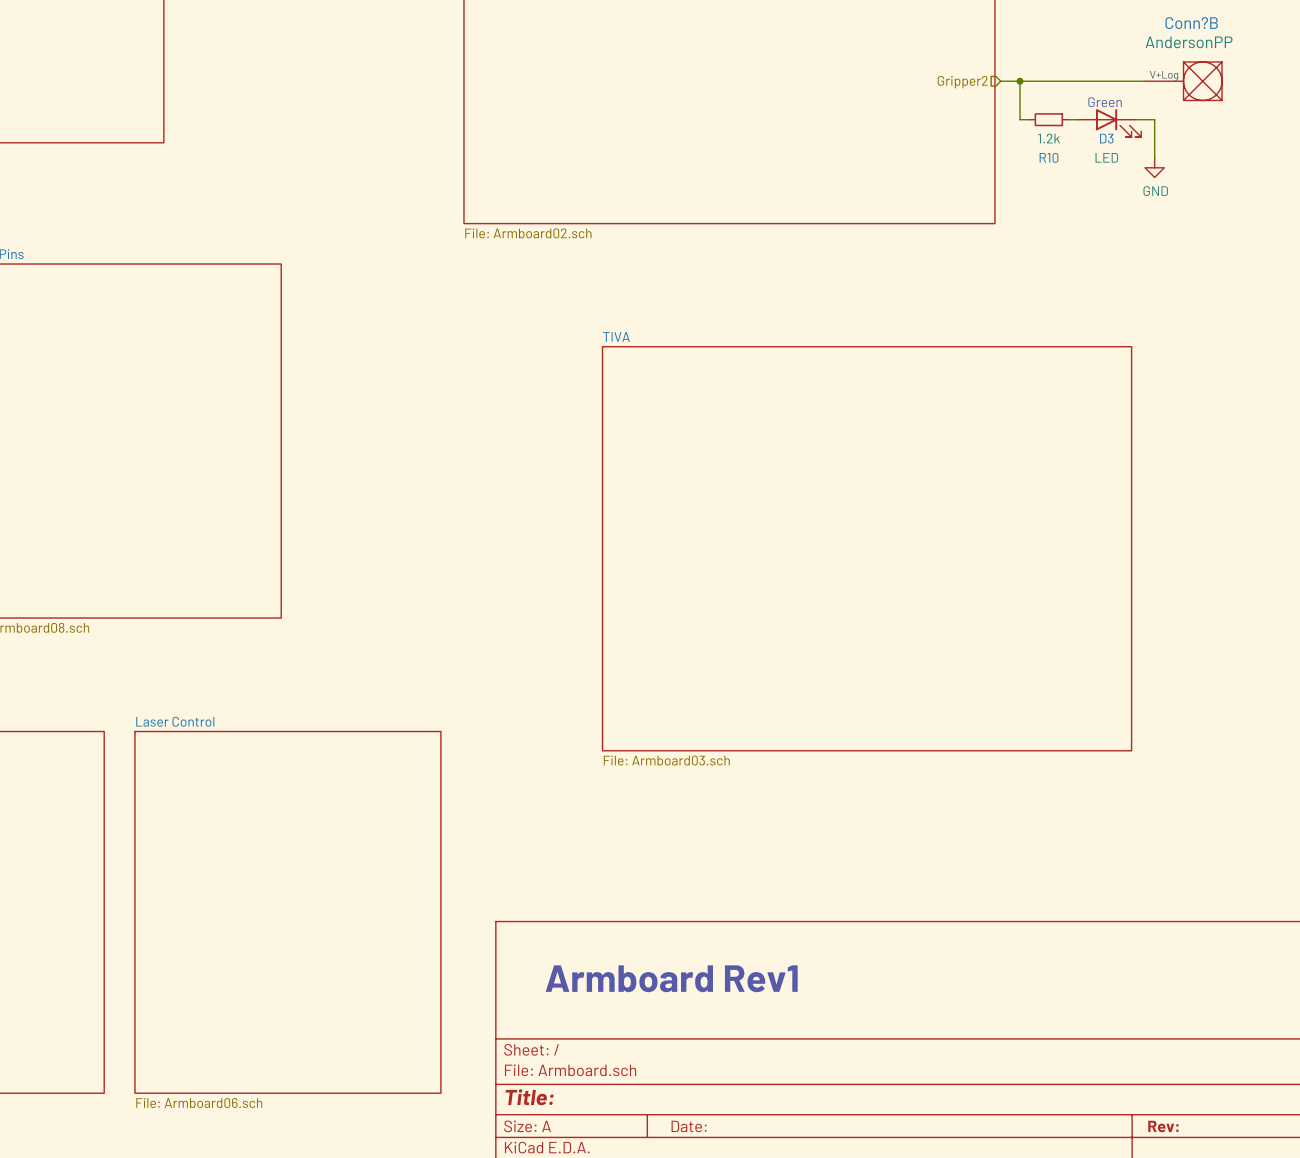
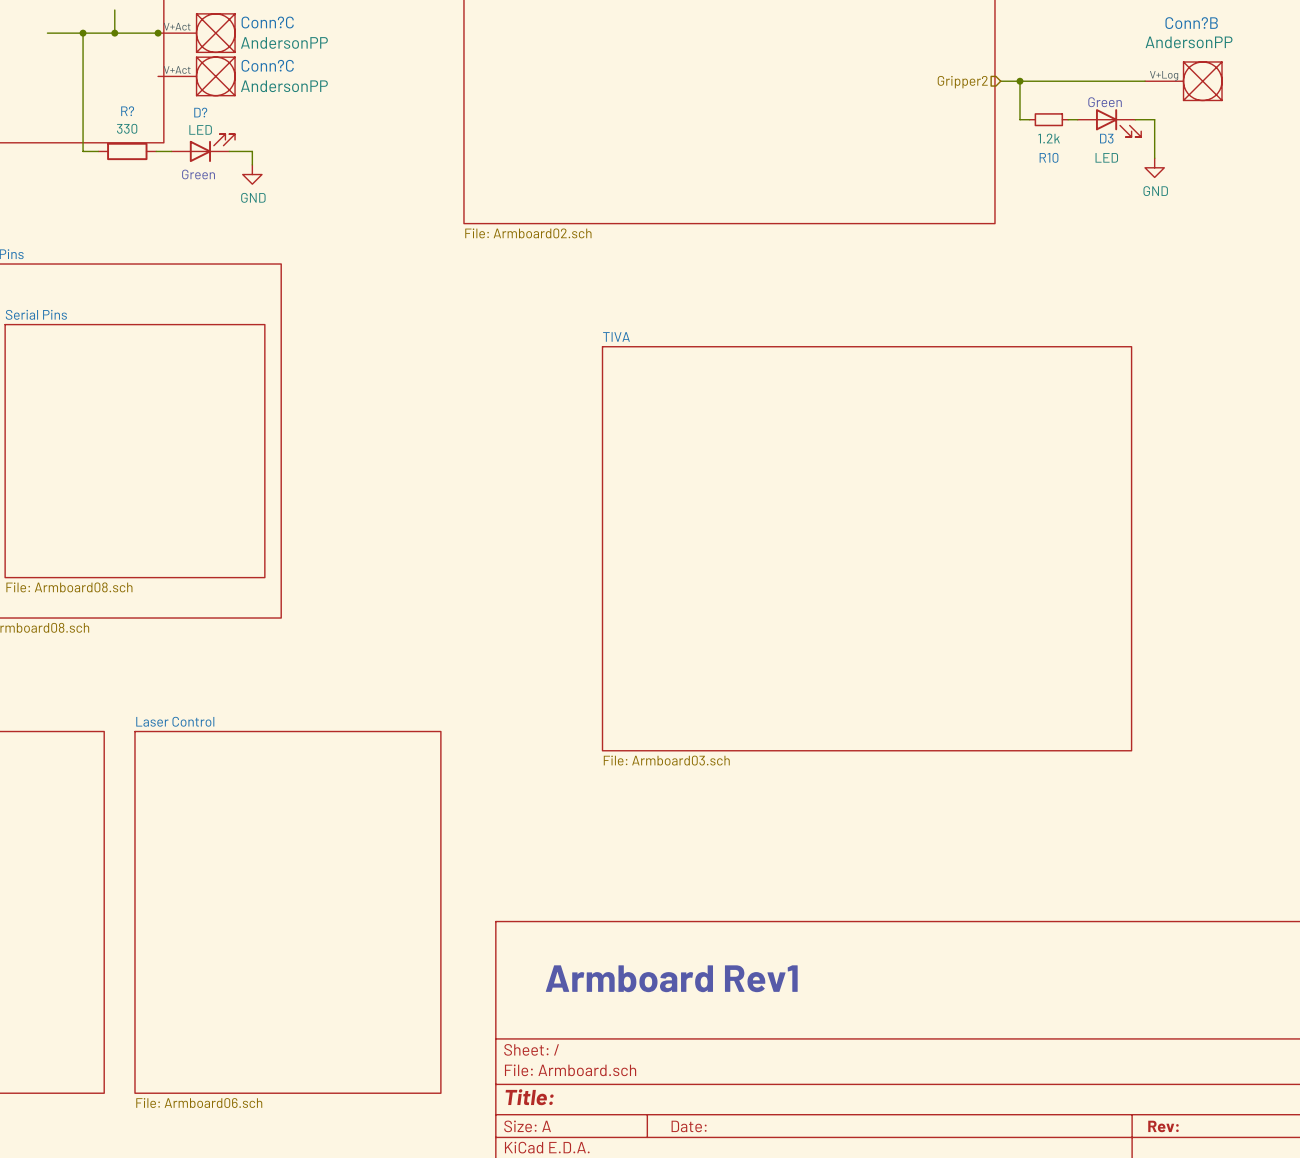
wire: none -> (114, 10) (114, 33)
wire: none -> (47, 33) (158, 33)
wire: none -> (83, 33) (83, 151) (98, 151)
junction: none -> (83, 33)
junction: none -> (114, 33)
junction: none -> (158, 33)
Conn?C: none -> AndersonPP (196, 33)
Conn?C: none -> AndersonPP (196, 76)
D?: none -> LED (203, 148)
R?: none -> 330 (127, 151)
wire: none -> (156, 151) (171, 151)
wire: none -> (229, 151) (252, 151) (252, 164)
text: none -> Green (198, 174)
power symbol: none -> GND (252, 174)
sheet Serial Pins: none -> File: Armboard08.sch (134, 451)

